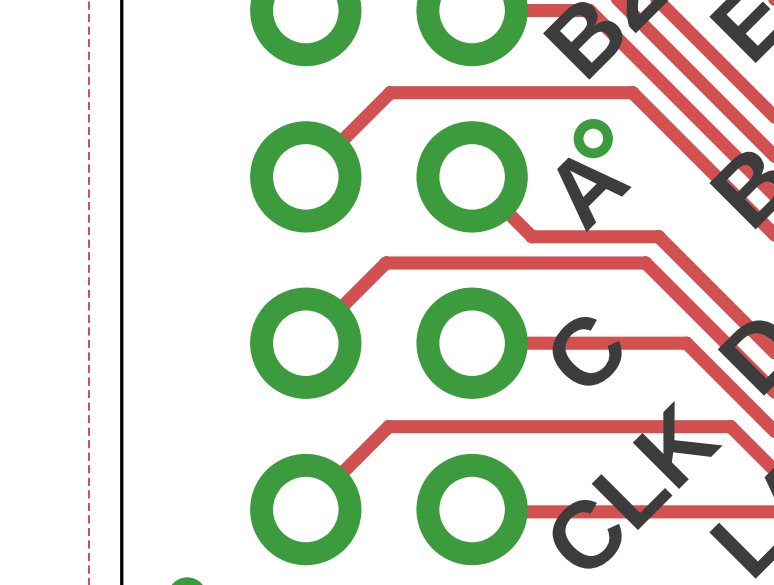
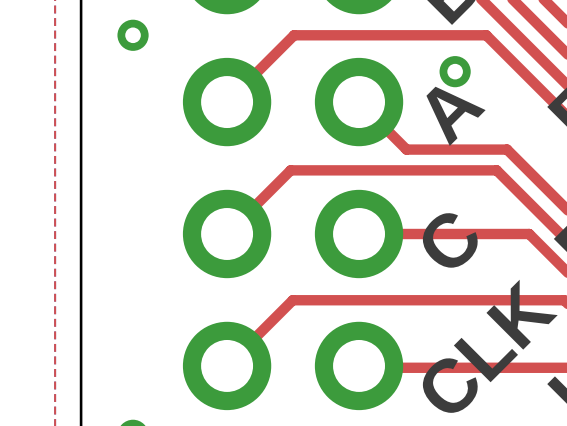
via: none -> (133, 35)

